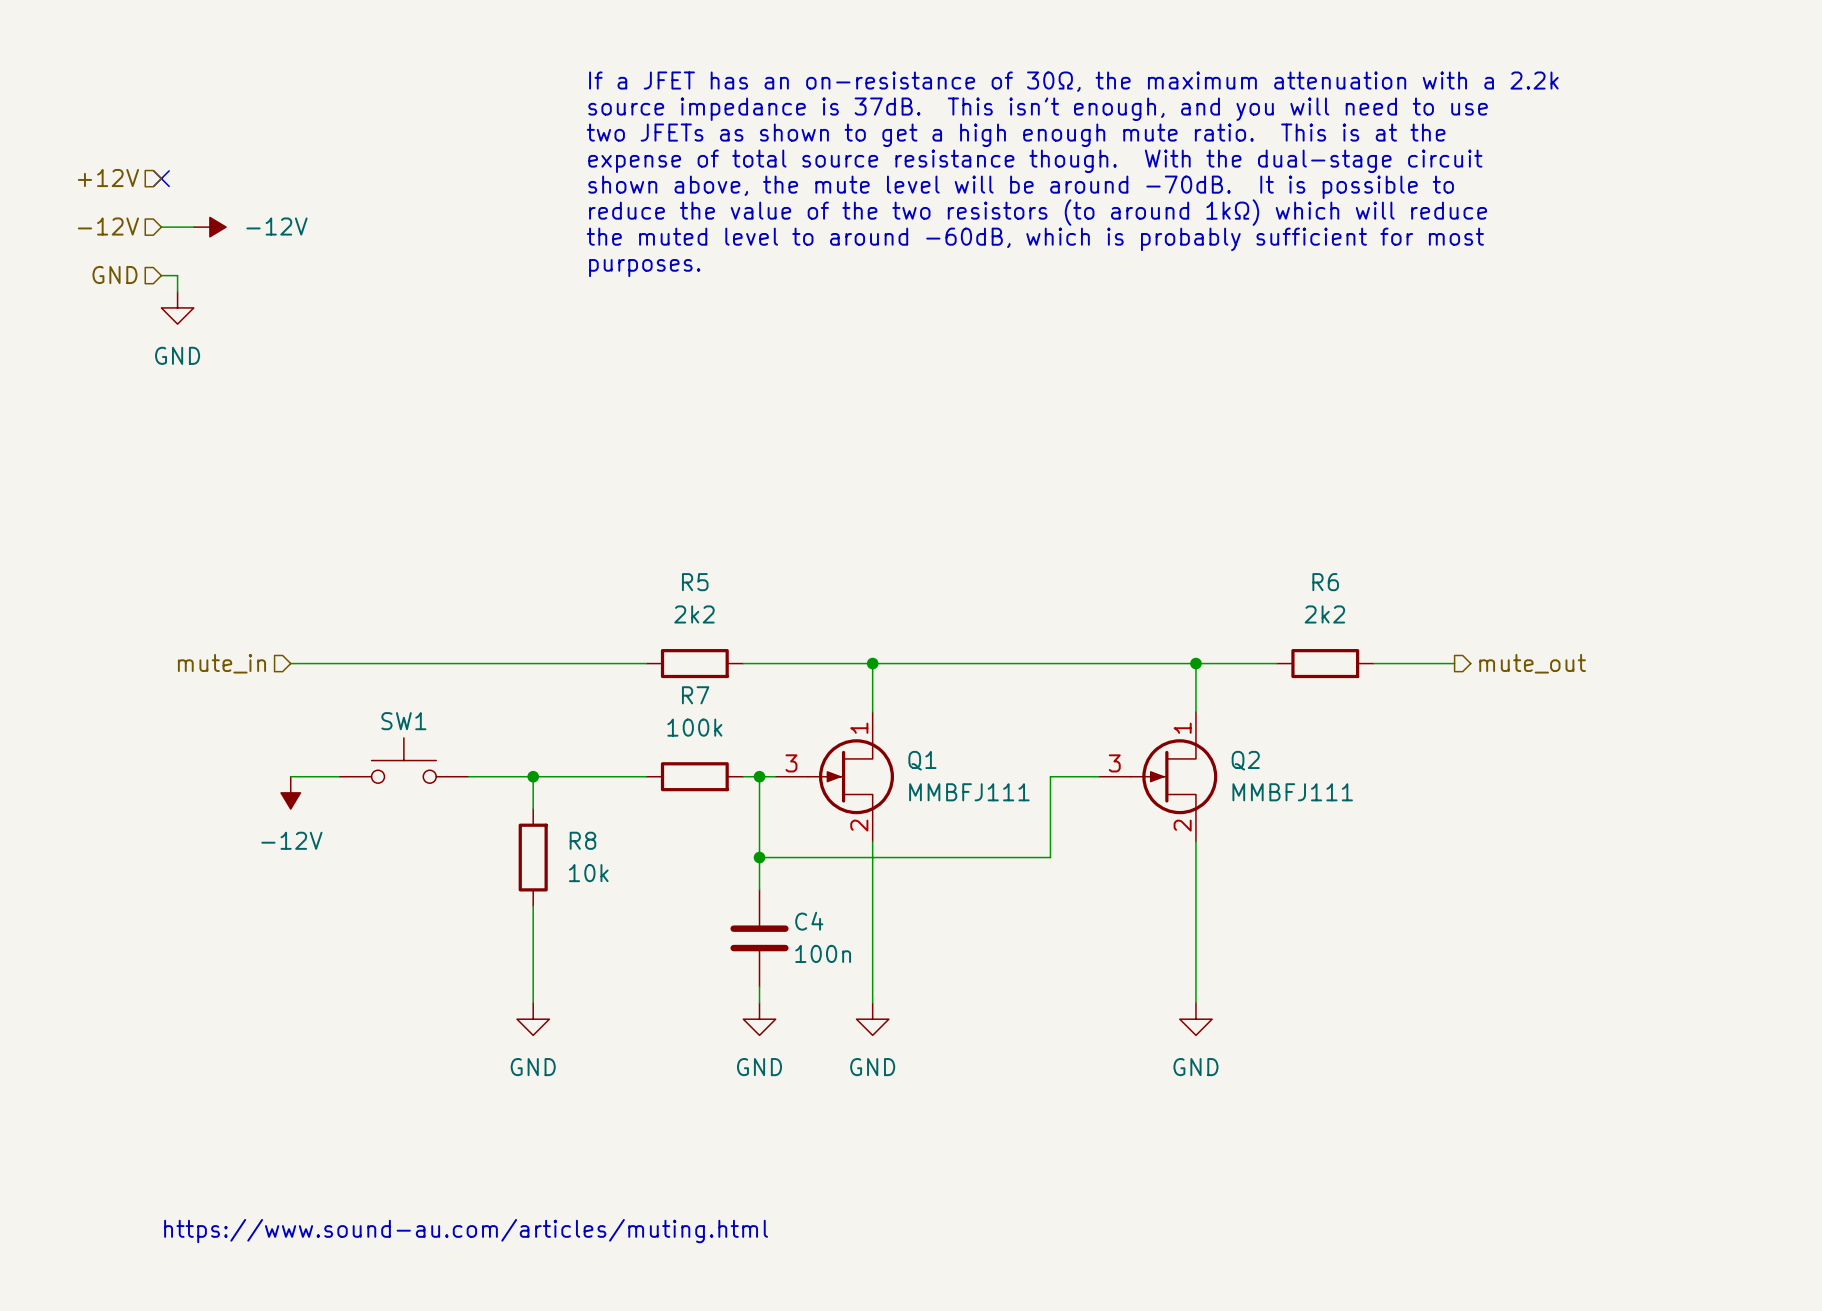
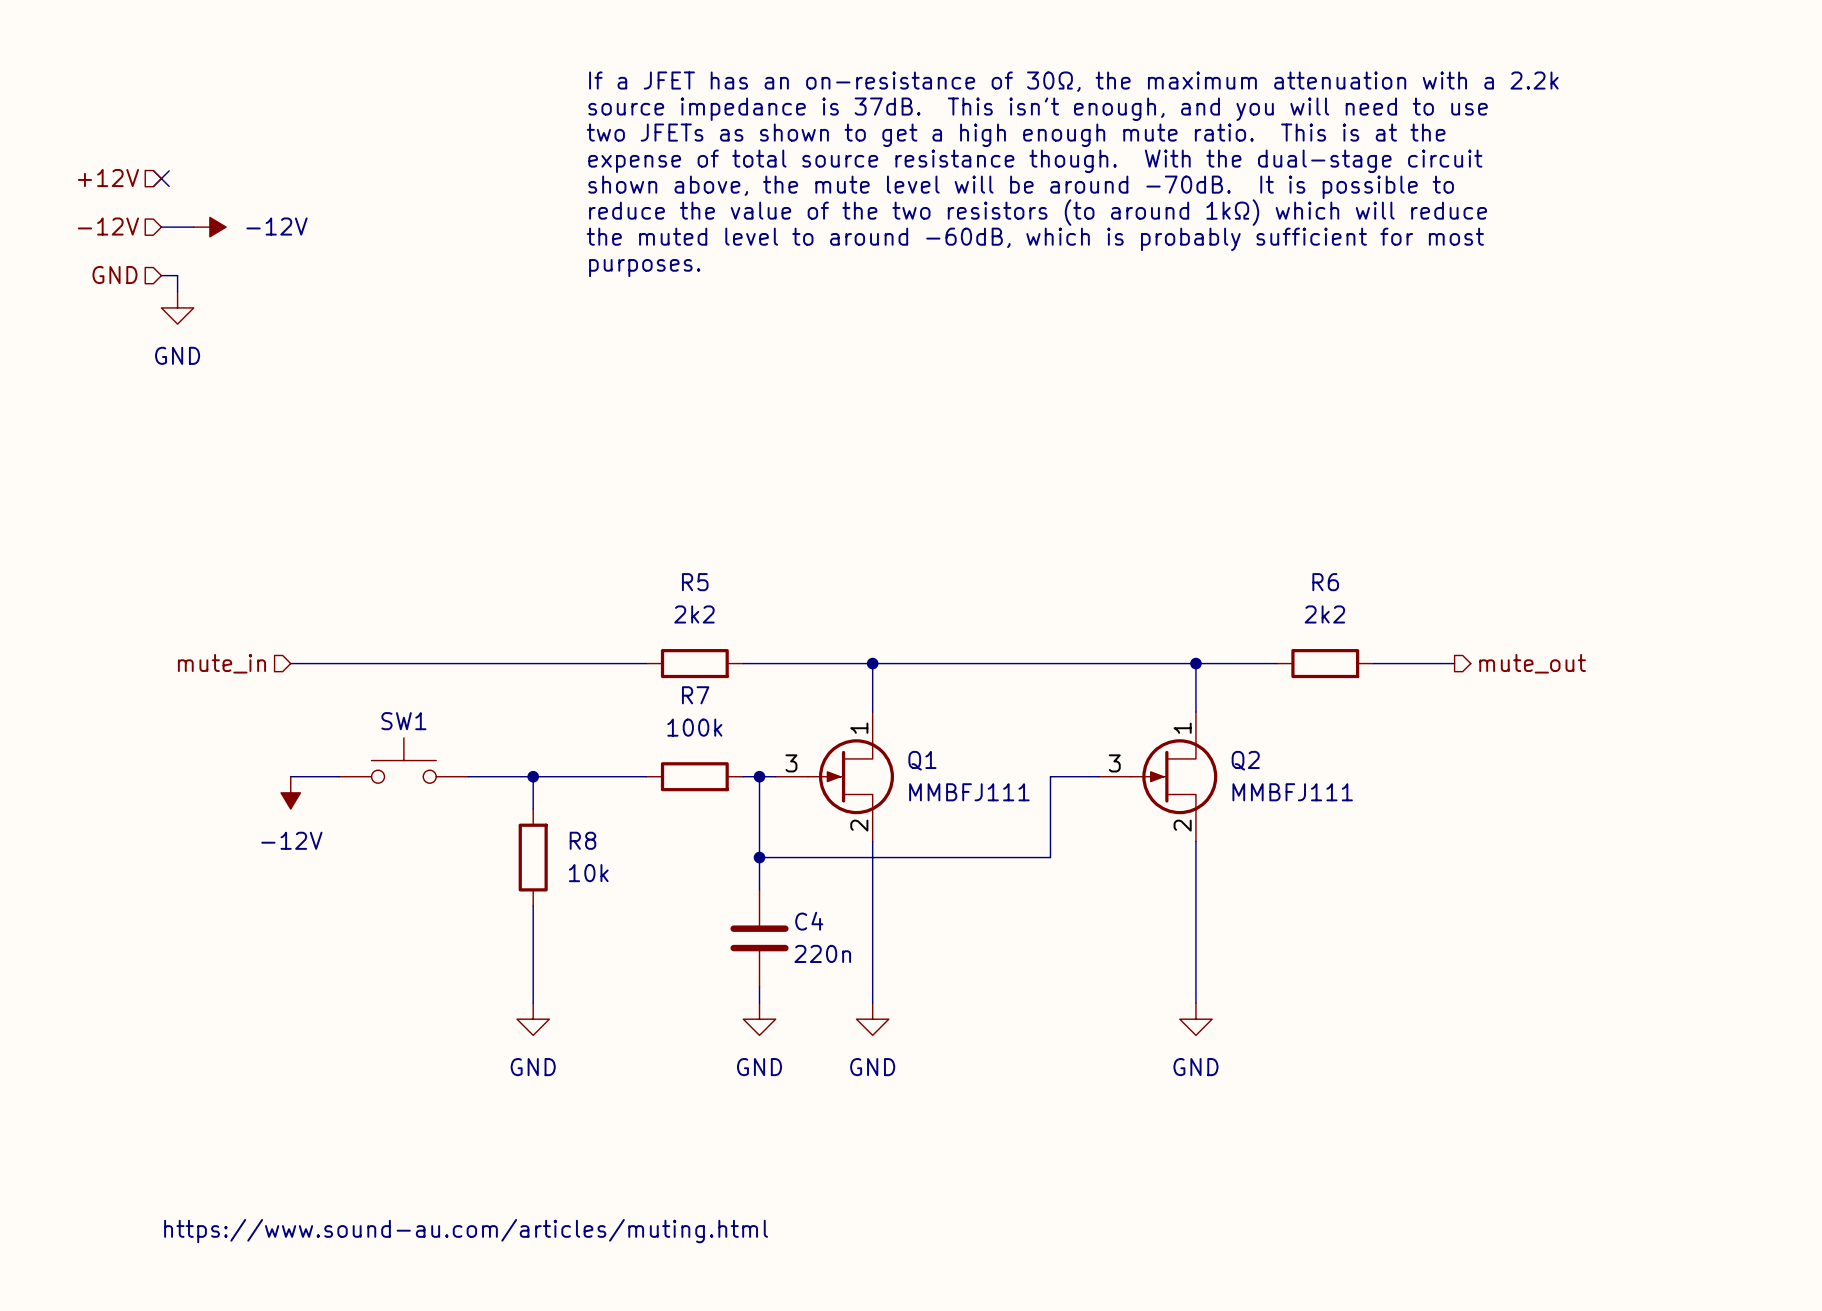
C4 value: 100n (823, 953) -> 220n (822, 953)

